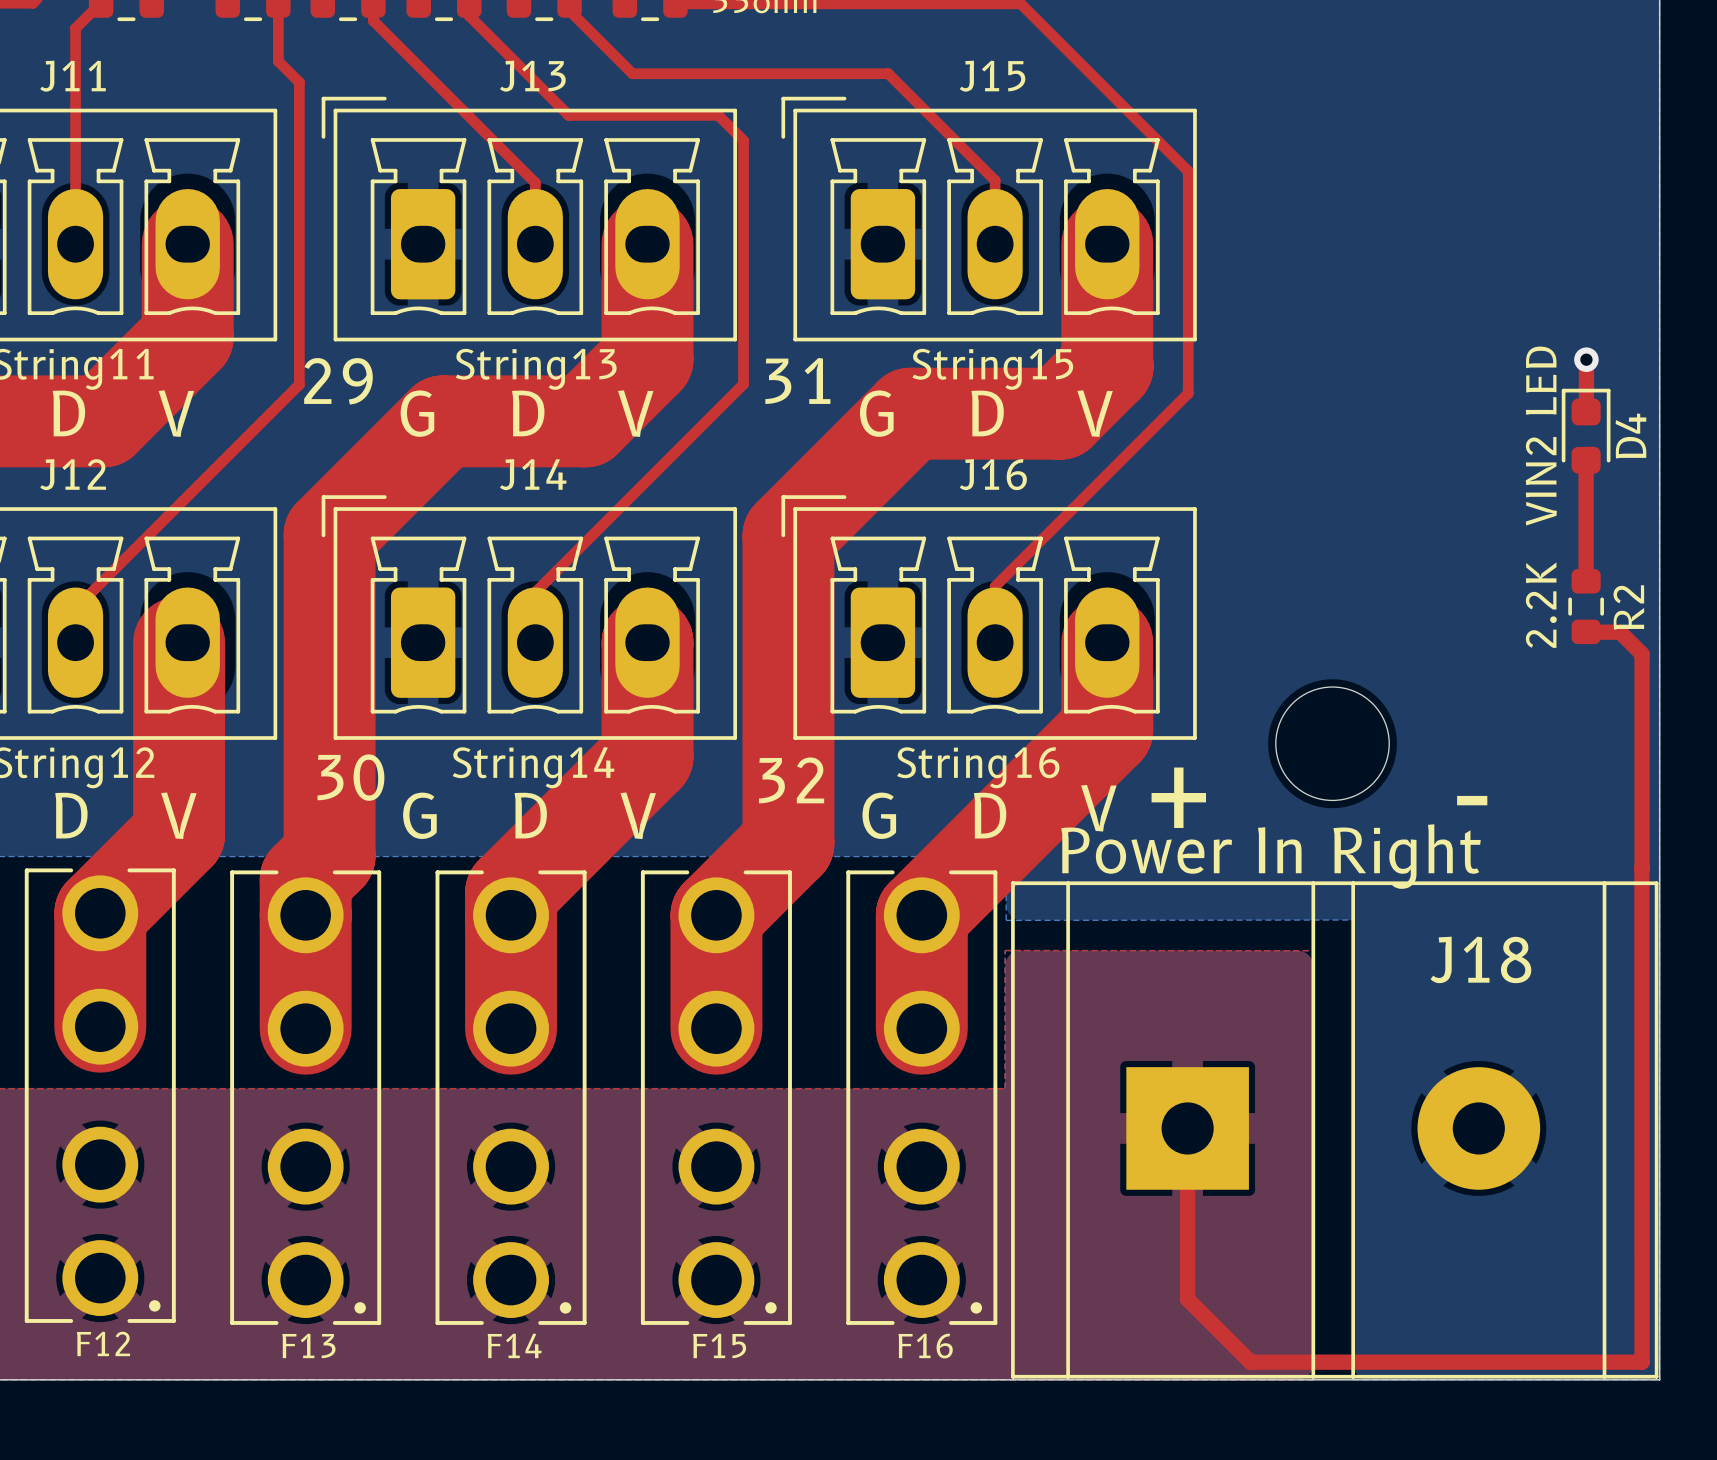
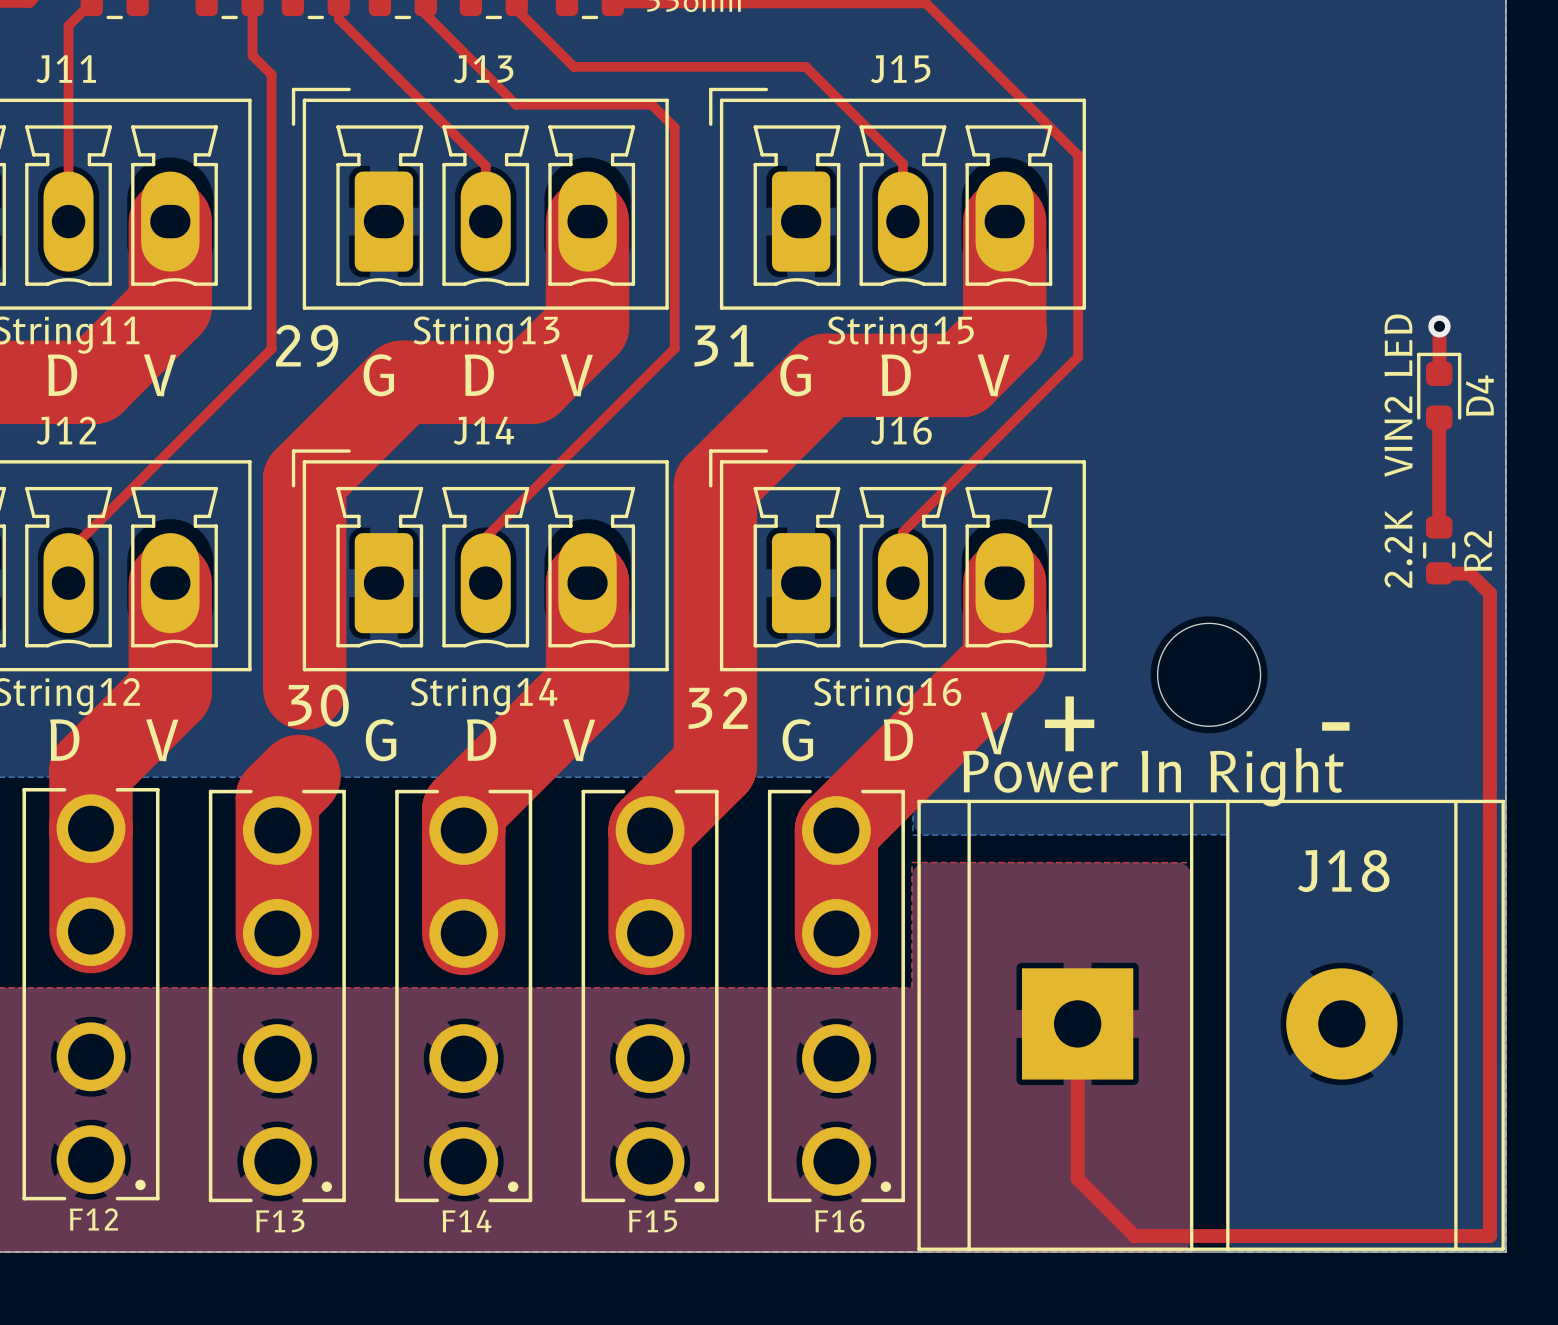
top track: (335, 528) (329, 534) (329, 855) -> (304, 479) (304, 688)
top track: (179, 642) (179, 834) (100, 913) -> (170, 583) (170, 690) (91, 770) (91, 828)

